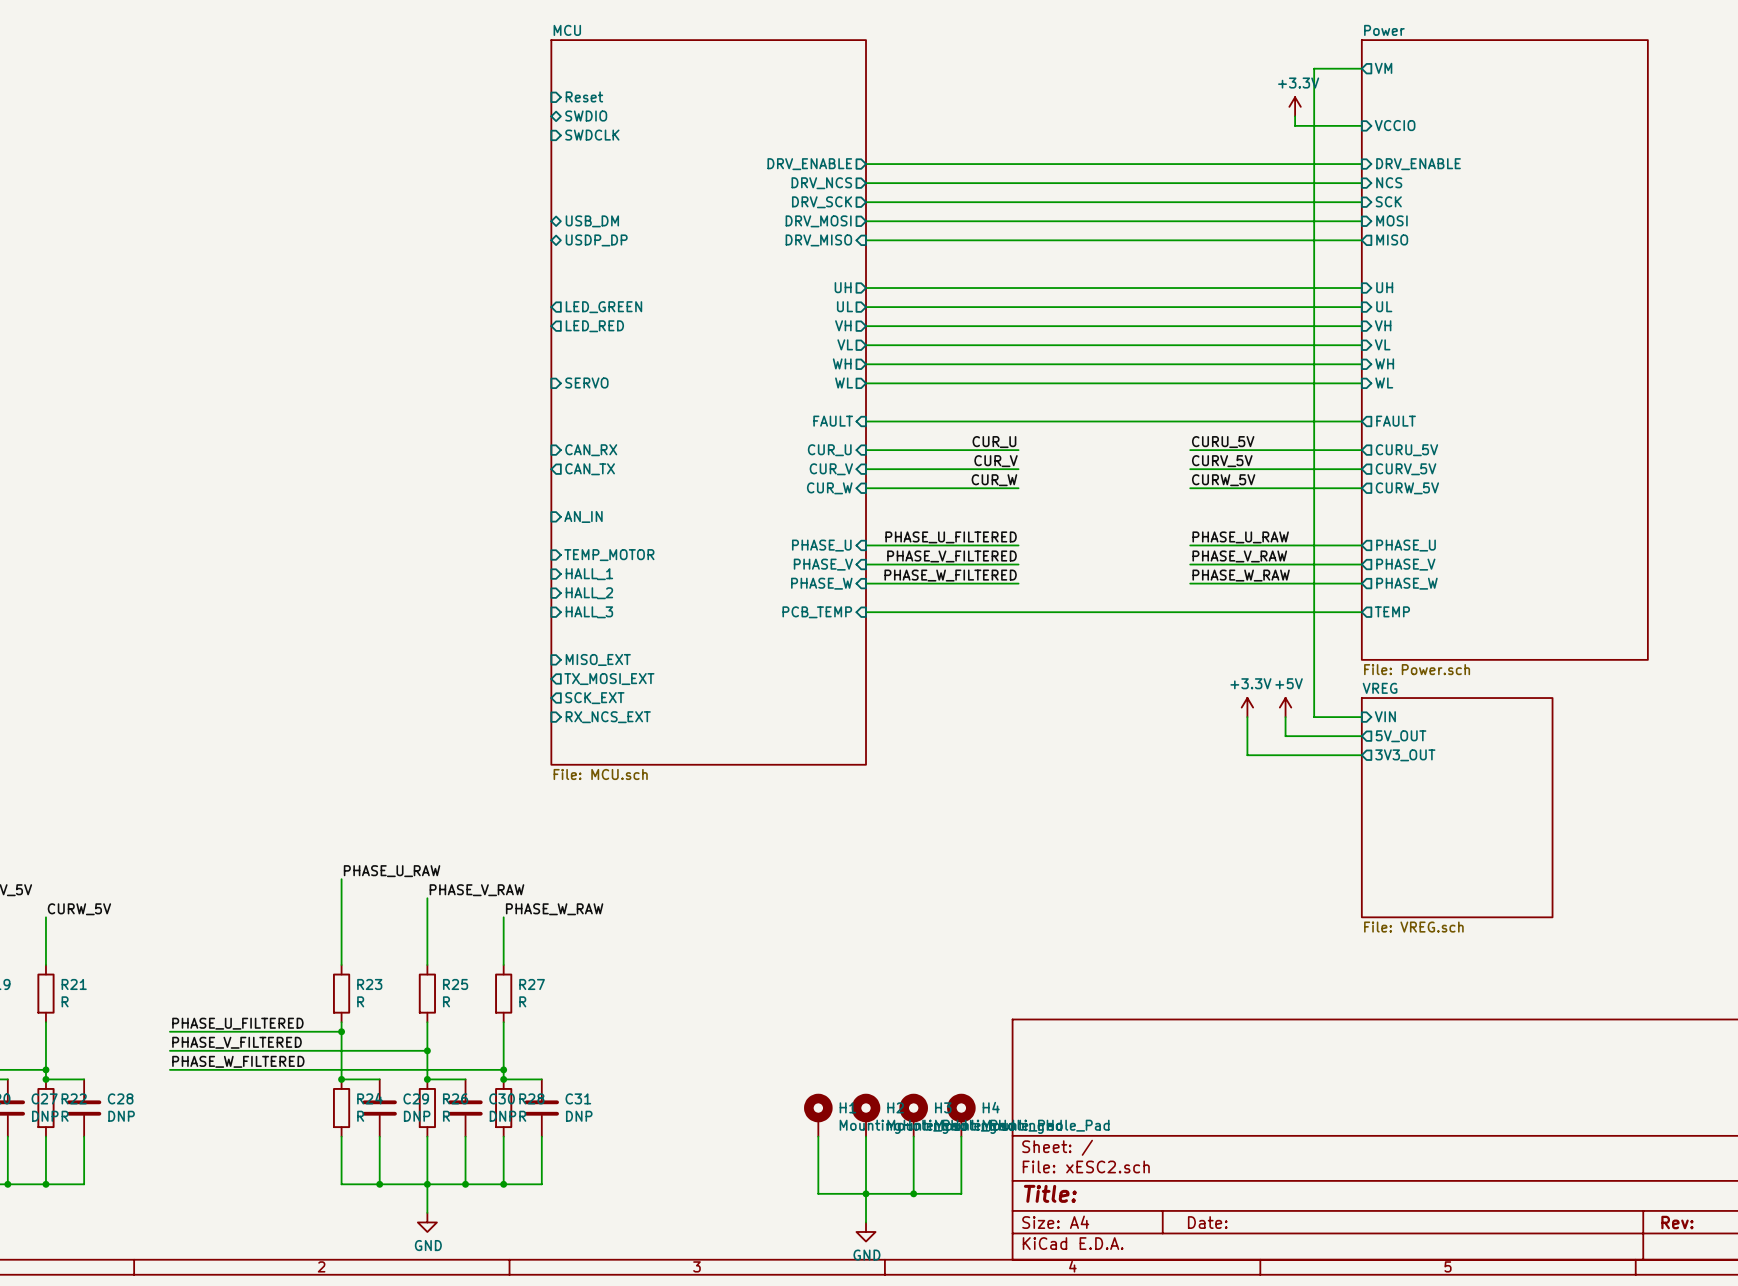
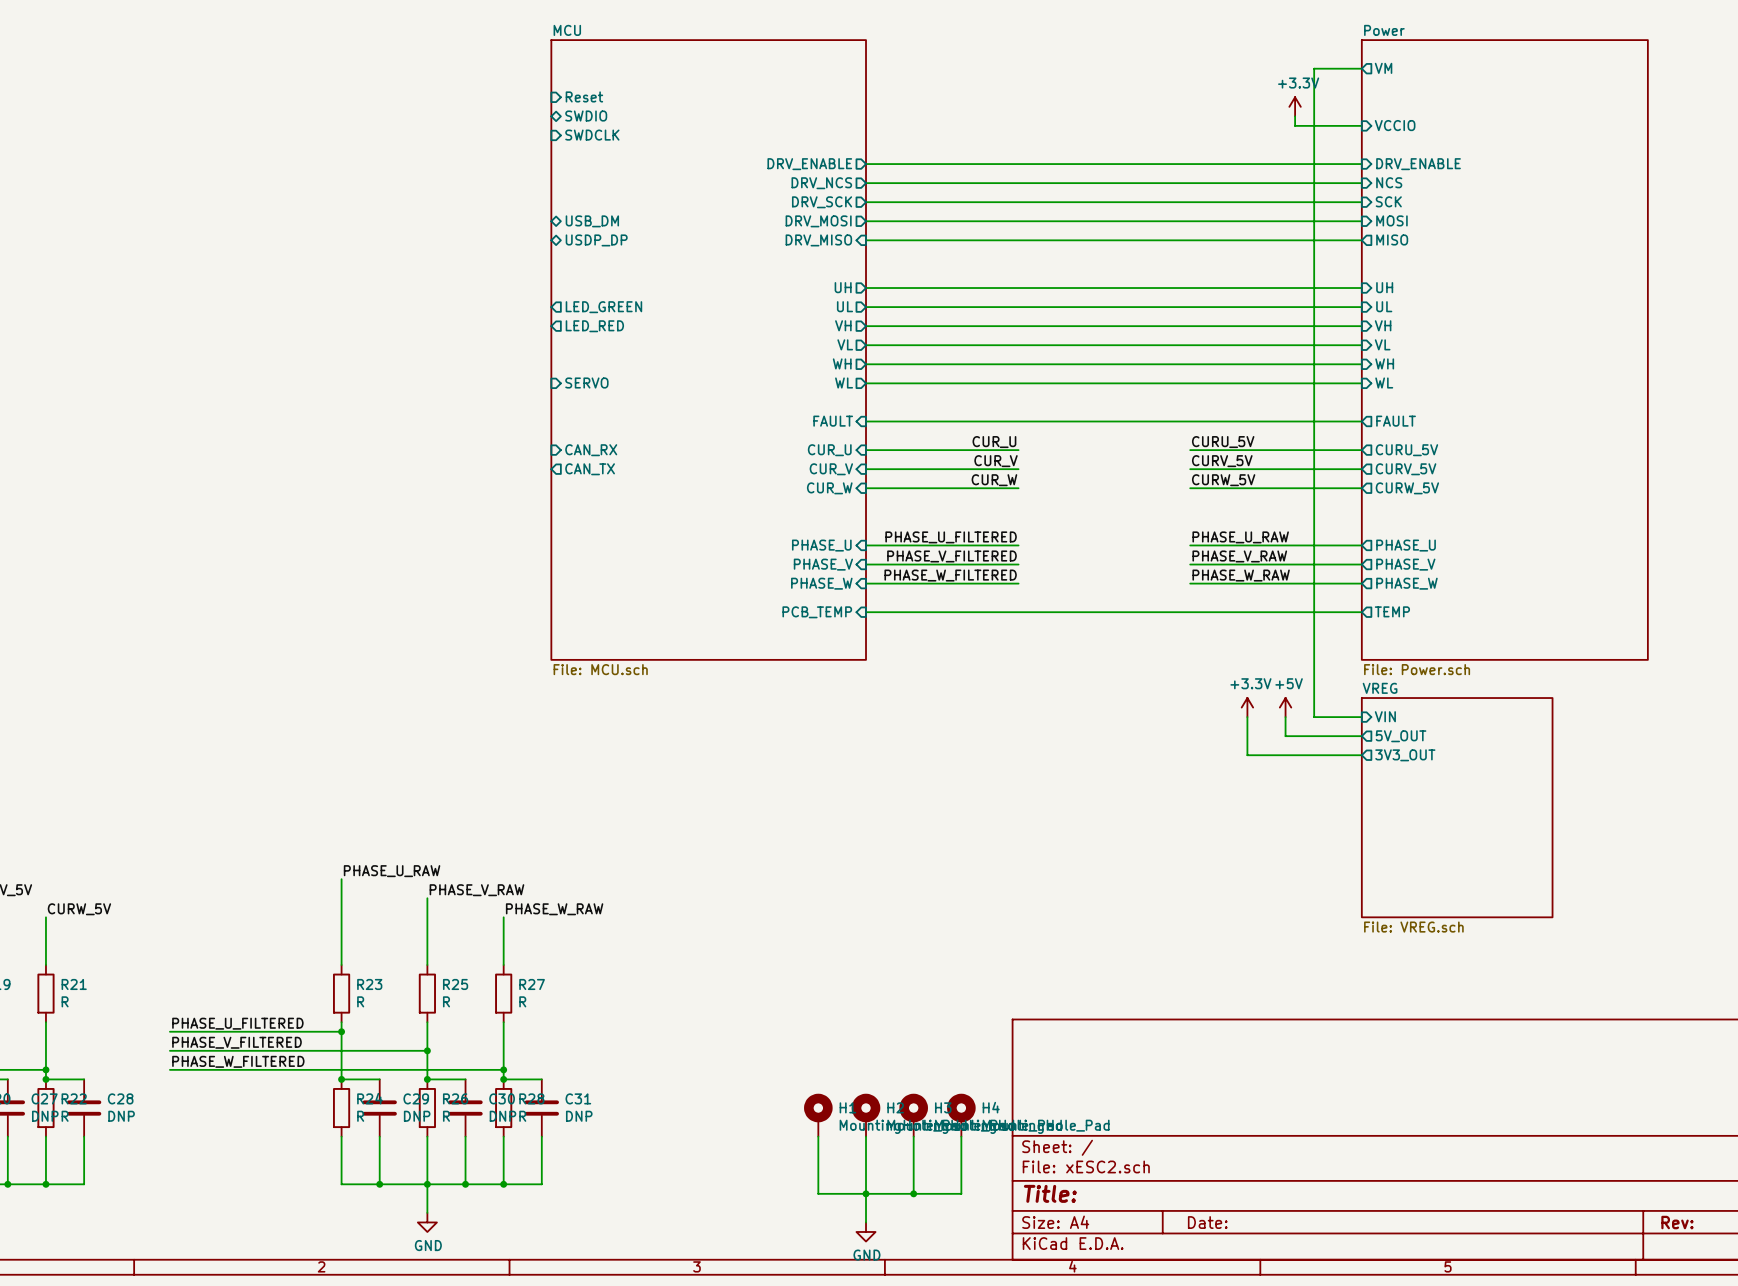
sheet MCU: none -> File: MCU.sch (708, 349)
sheet MCU: File: MCU.sch (708, 402) -> none
sheet pin: AN_IN (583, 516) -> none
sheet pin: TEMP_MOTOR (609, 555) -> none
sheet pin: HALL_1 (589, 574) -> none
sheet pin: HALL_2 (589, 593) -> none
sheet pin: HALL_3 (589, 612) -> none
sheet pin: MISO_EXT (598, 659) -> none
sheet pin: TX_MOSI_EXT (609, 679) -> none
sheet pin: SCK_EXT (594, 698) -> none
sheet pin: RX_NCS_EXT (608, 717) -> none

